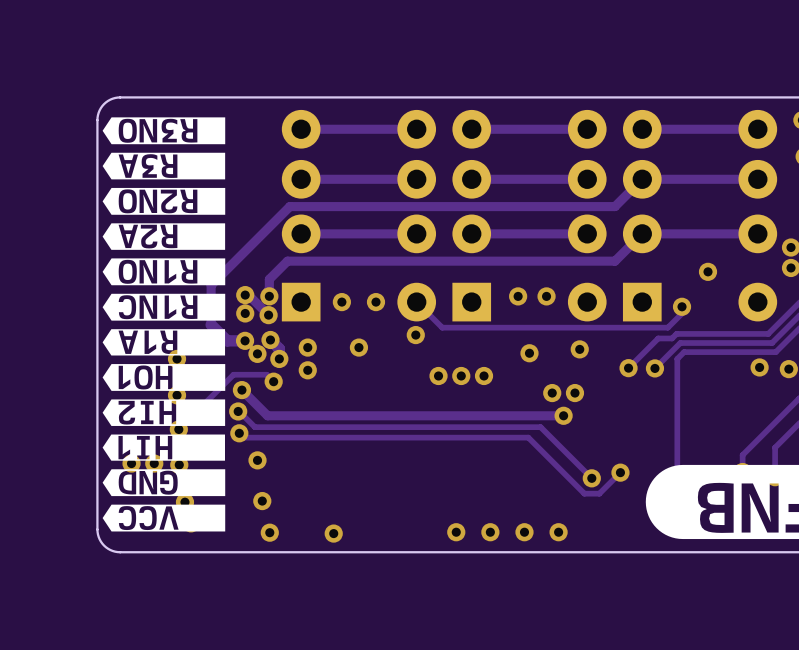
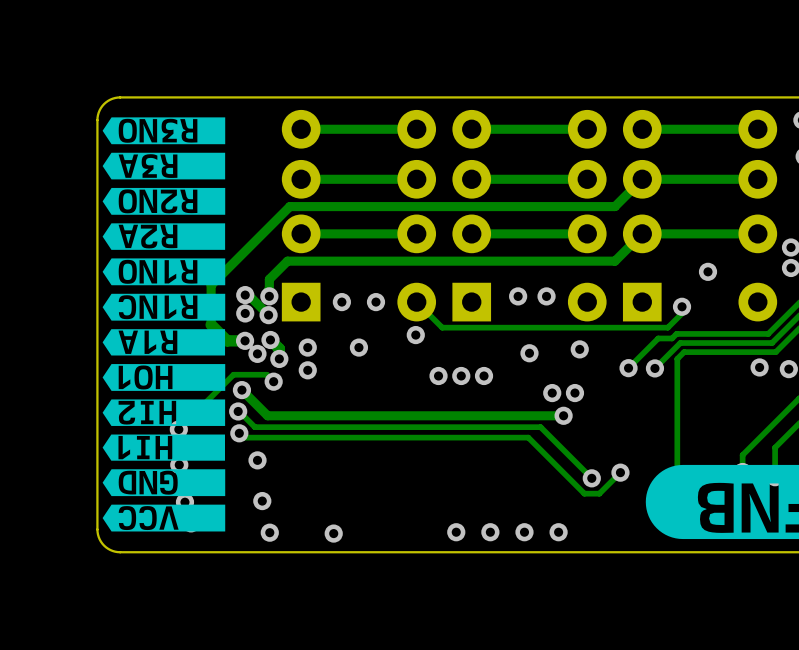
via: (177, 358) -> none
via: (177, 395) -> none
via: (131, 463) -> none
via: (154, 463) -> none

